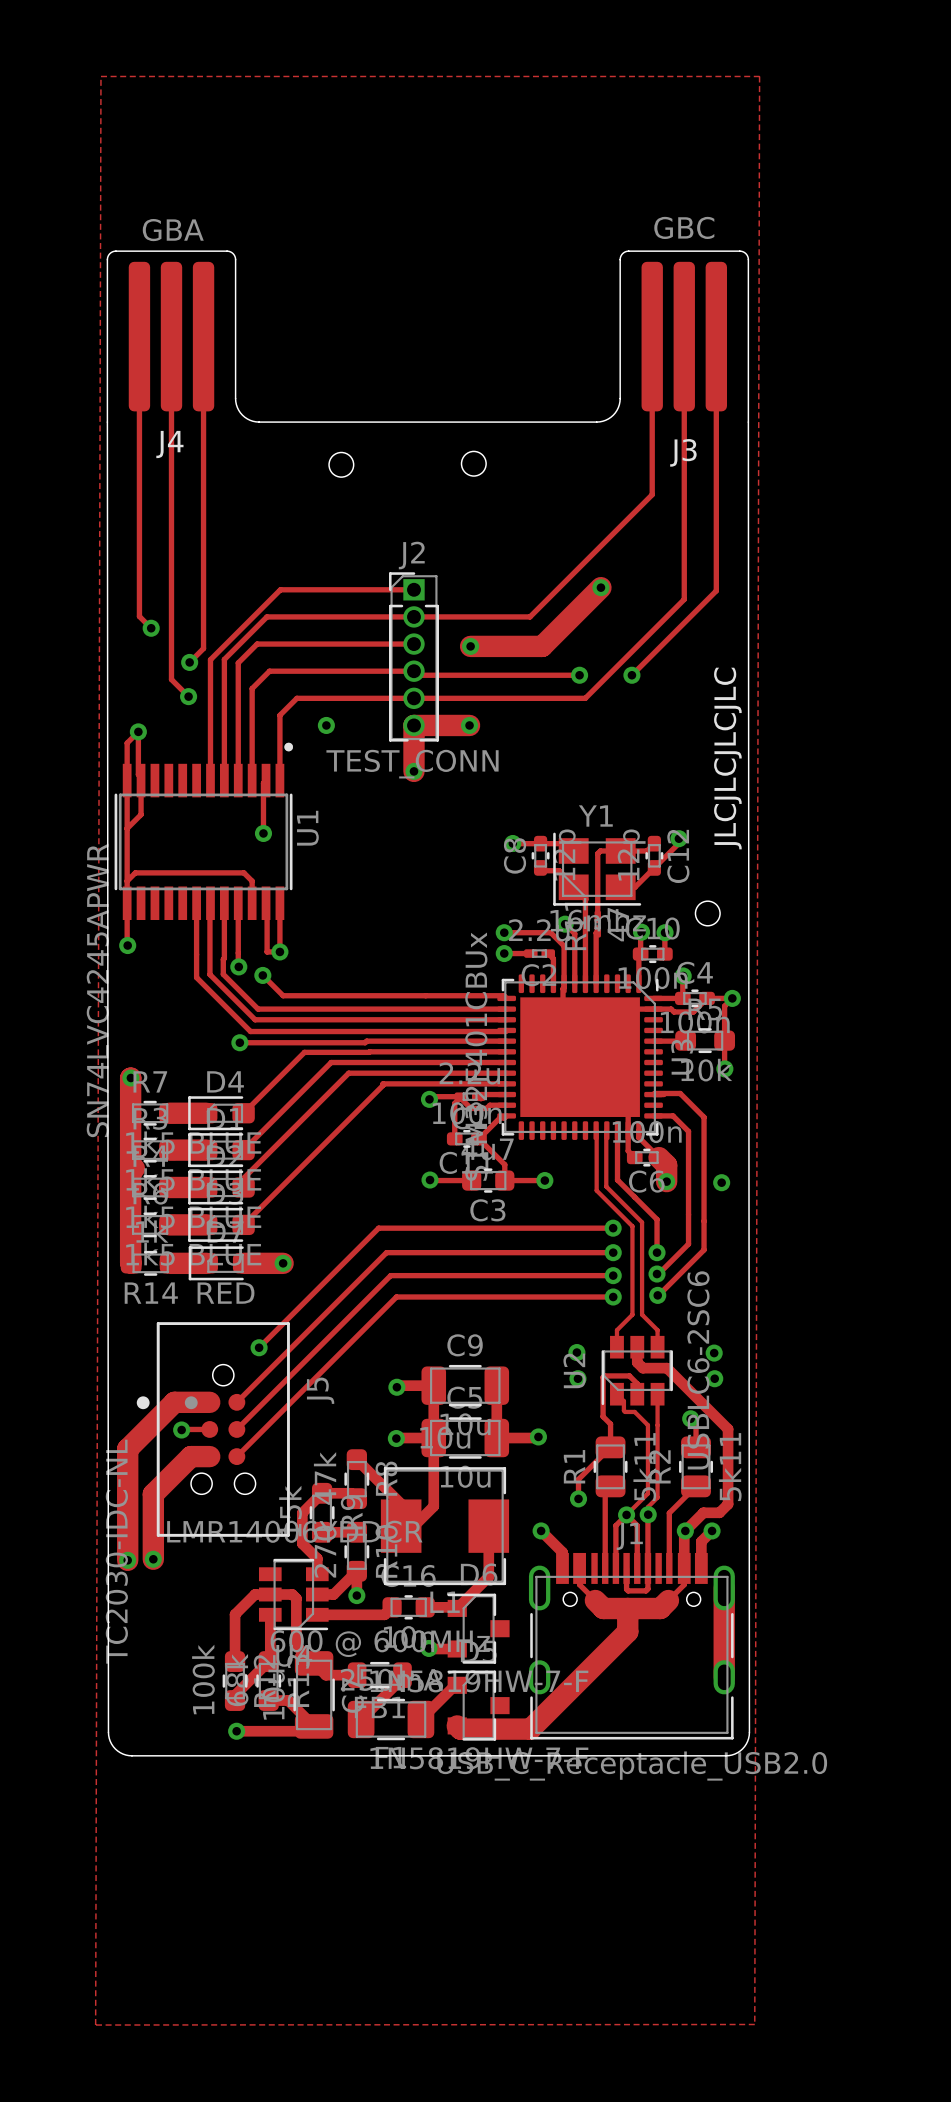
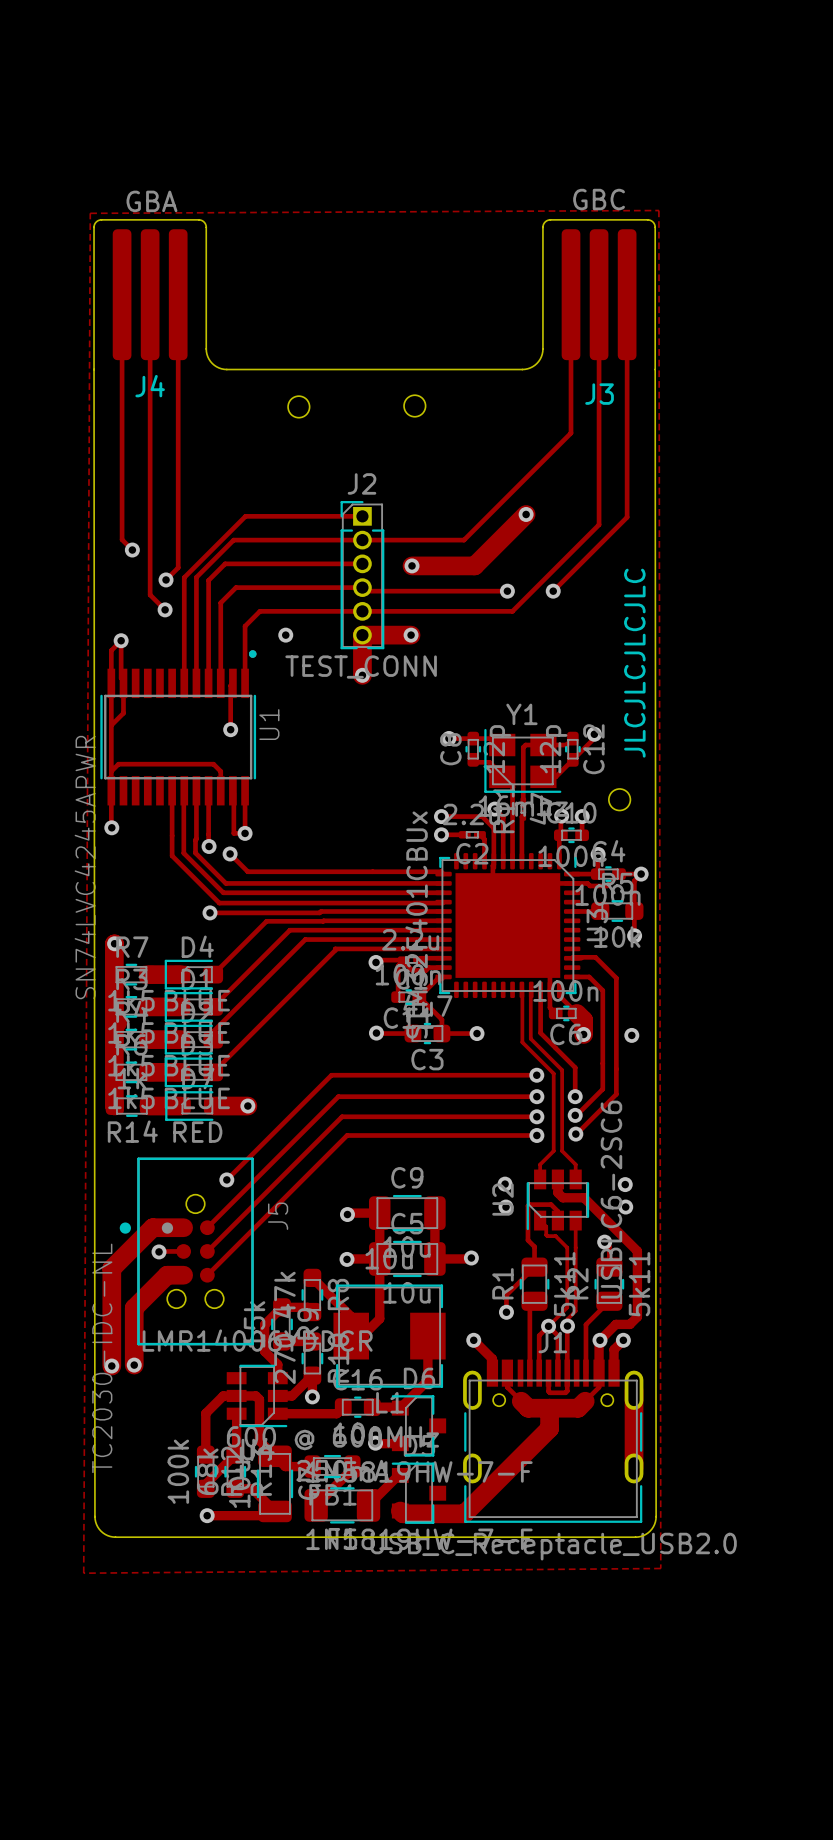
zone outline: (100, 76) (95, 2025) (754, 2024) (759, 76) (100, 76) -> (658, 210) (90, 213) (83, 1573) (660, 1568) (658, 210)

